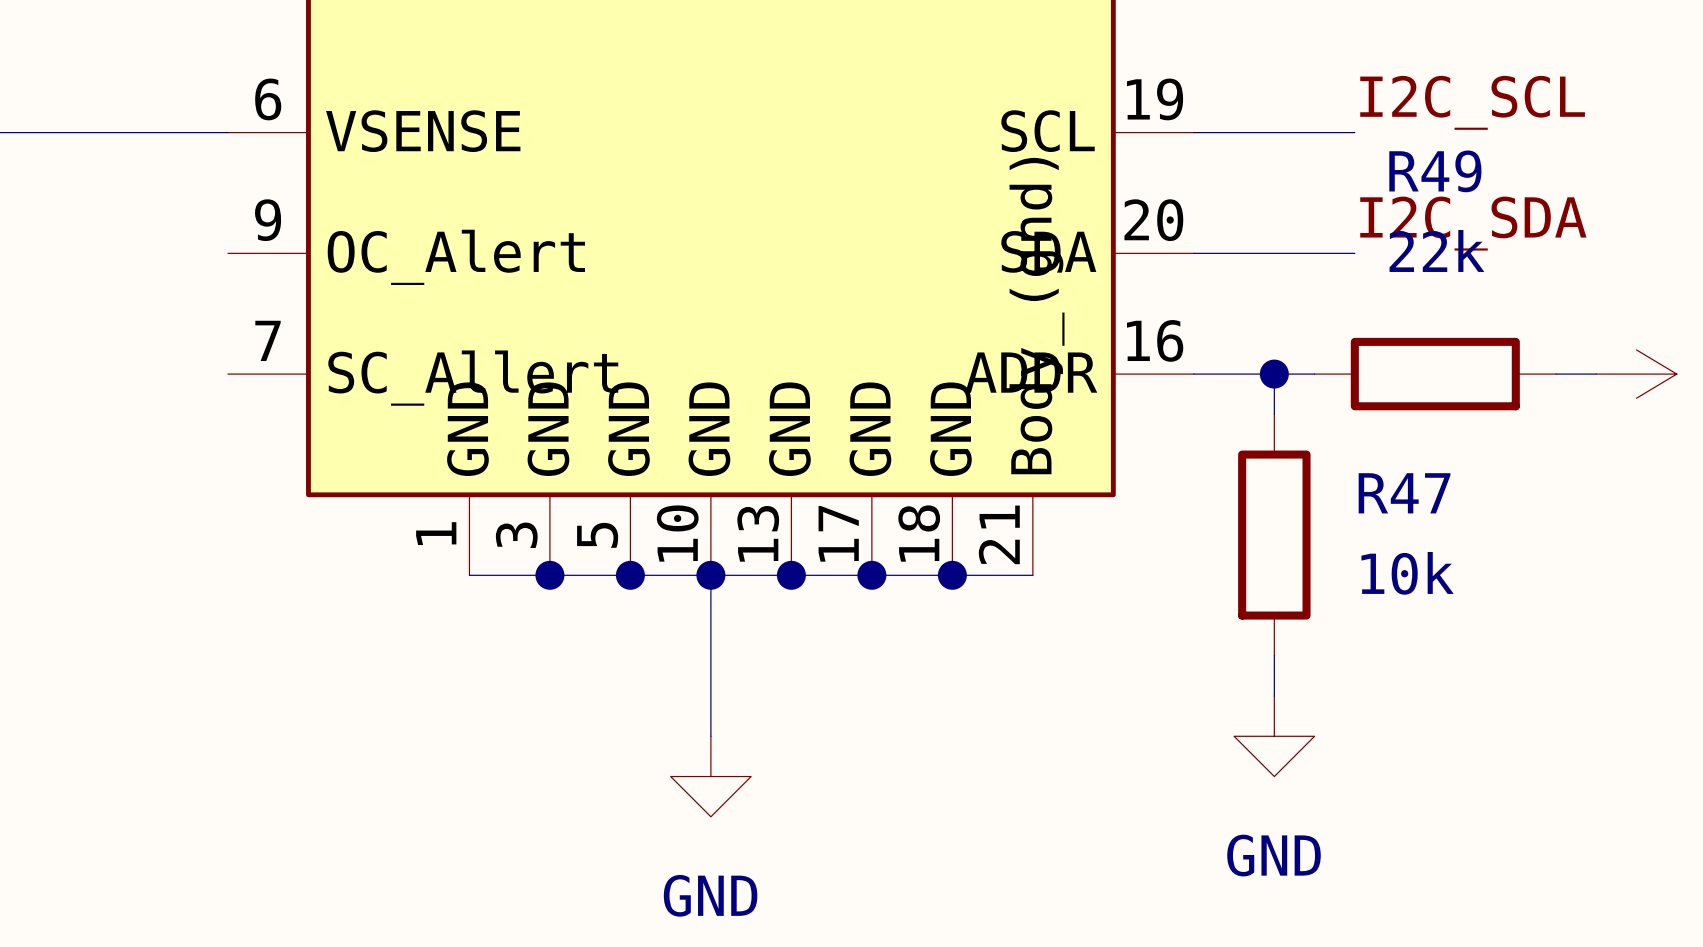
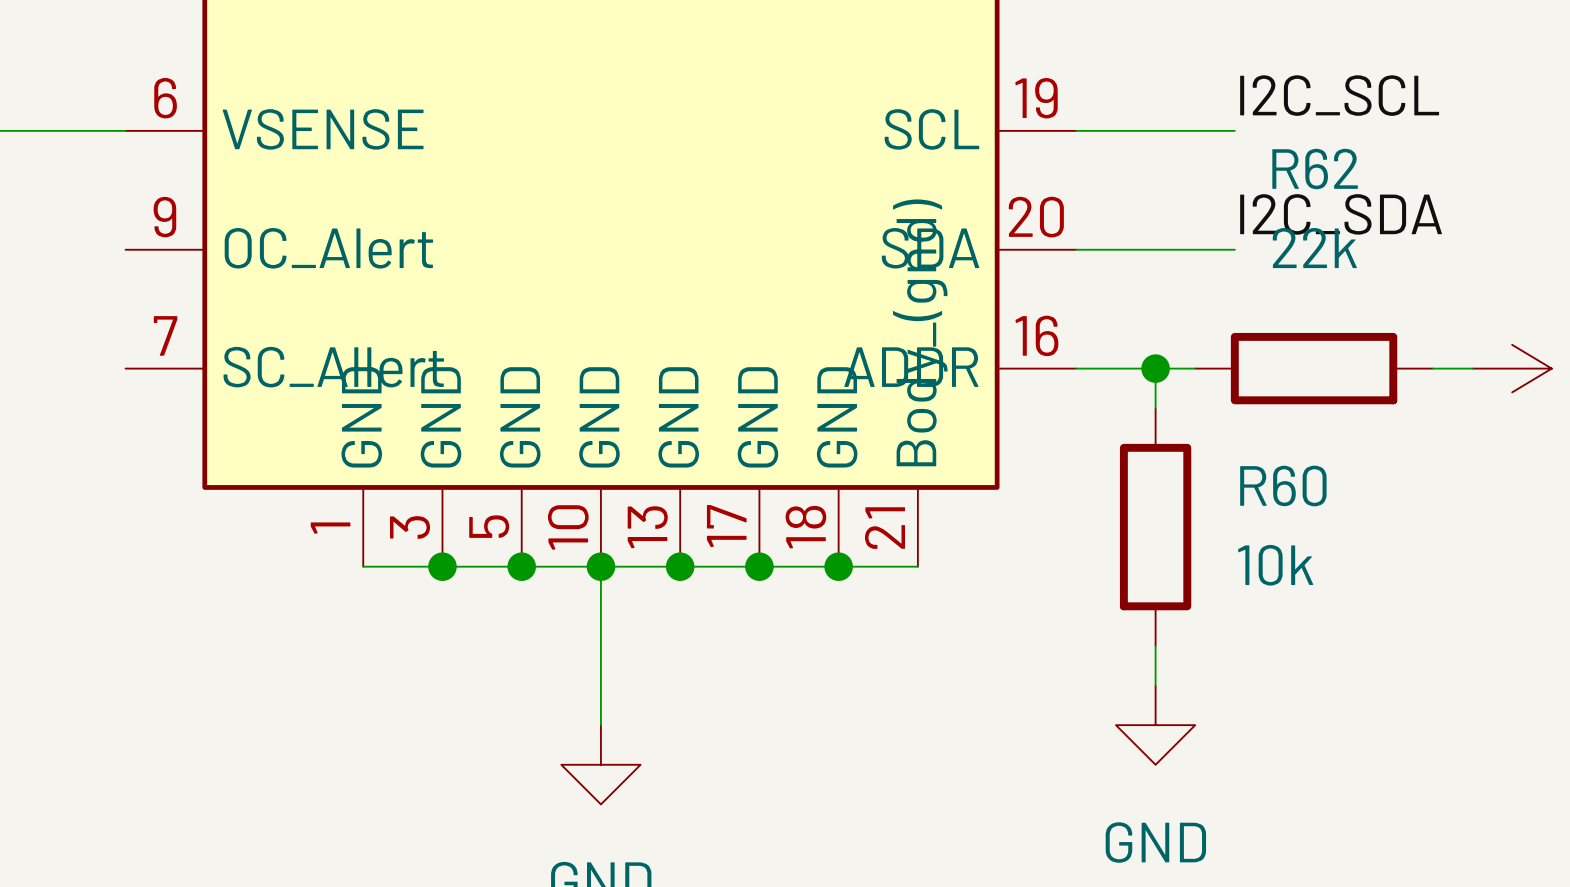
R49 name: R49 (1435, 171) -> R62 (1315, 169)
R47 name: R47 (1404, 493) -> R60 (1283, 486)

